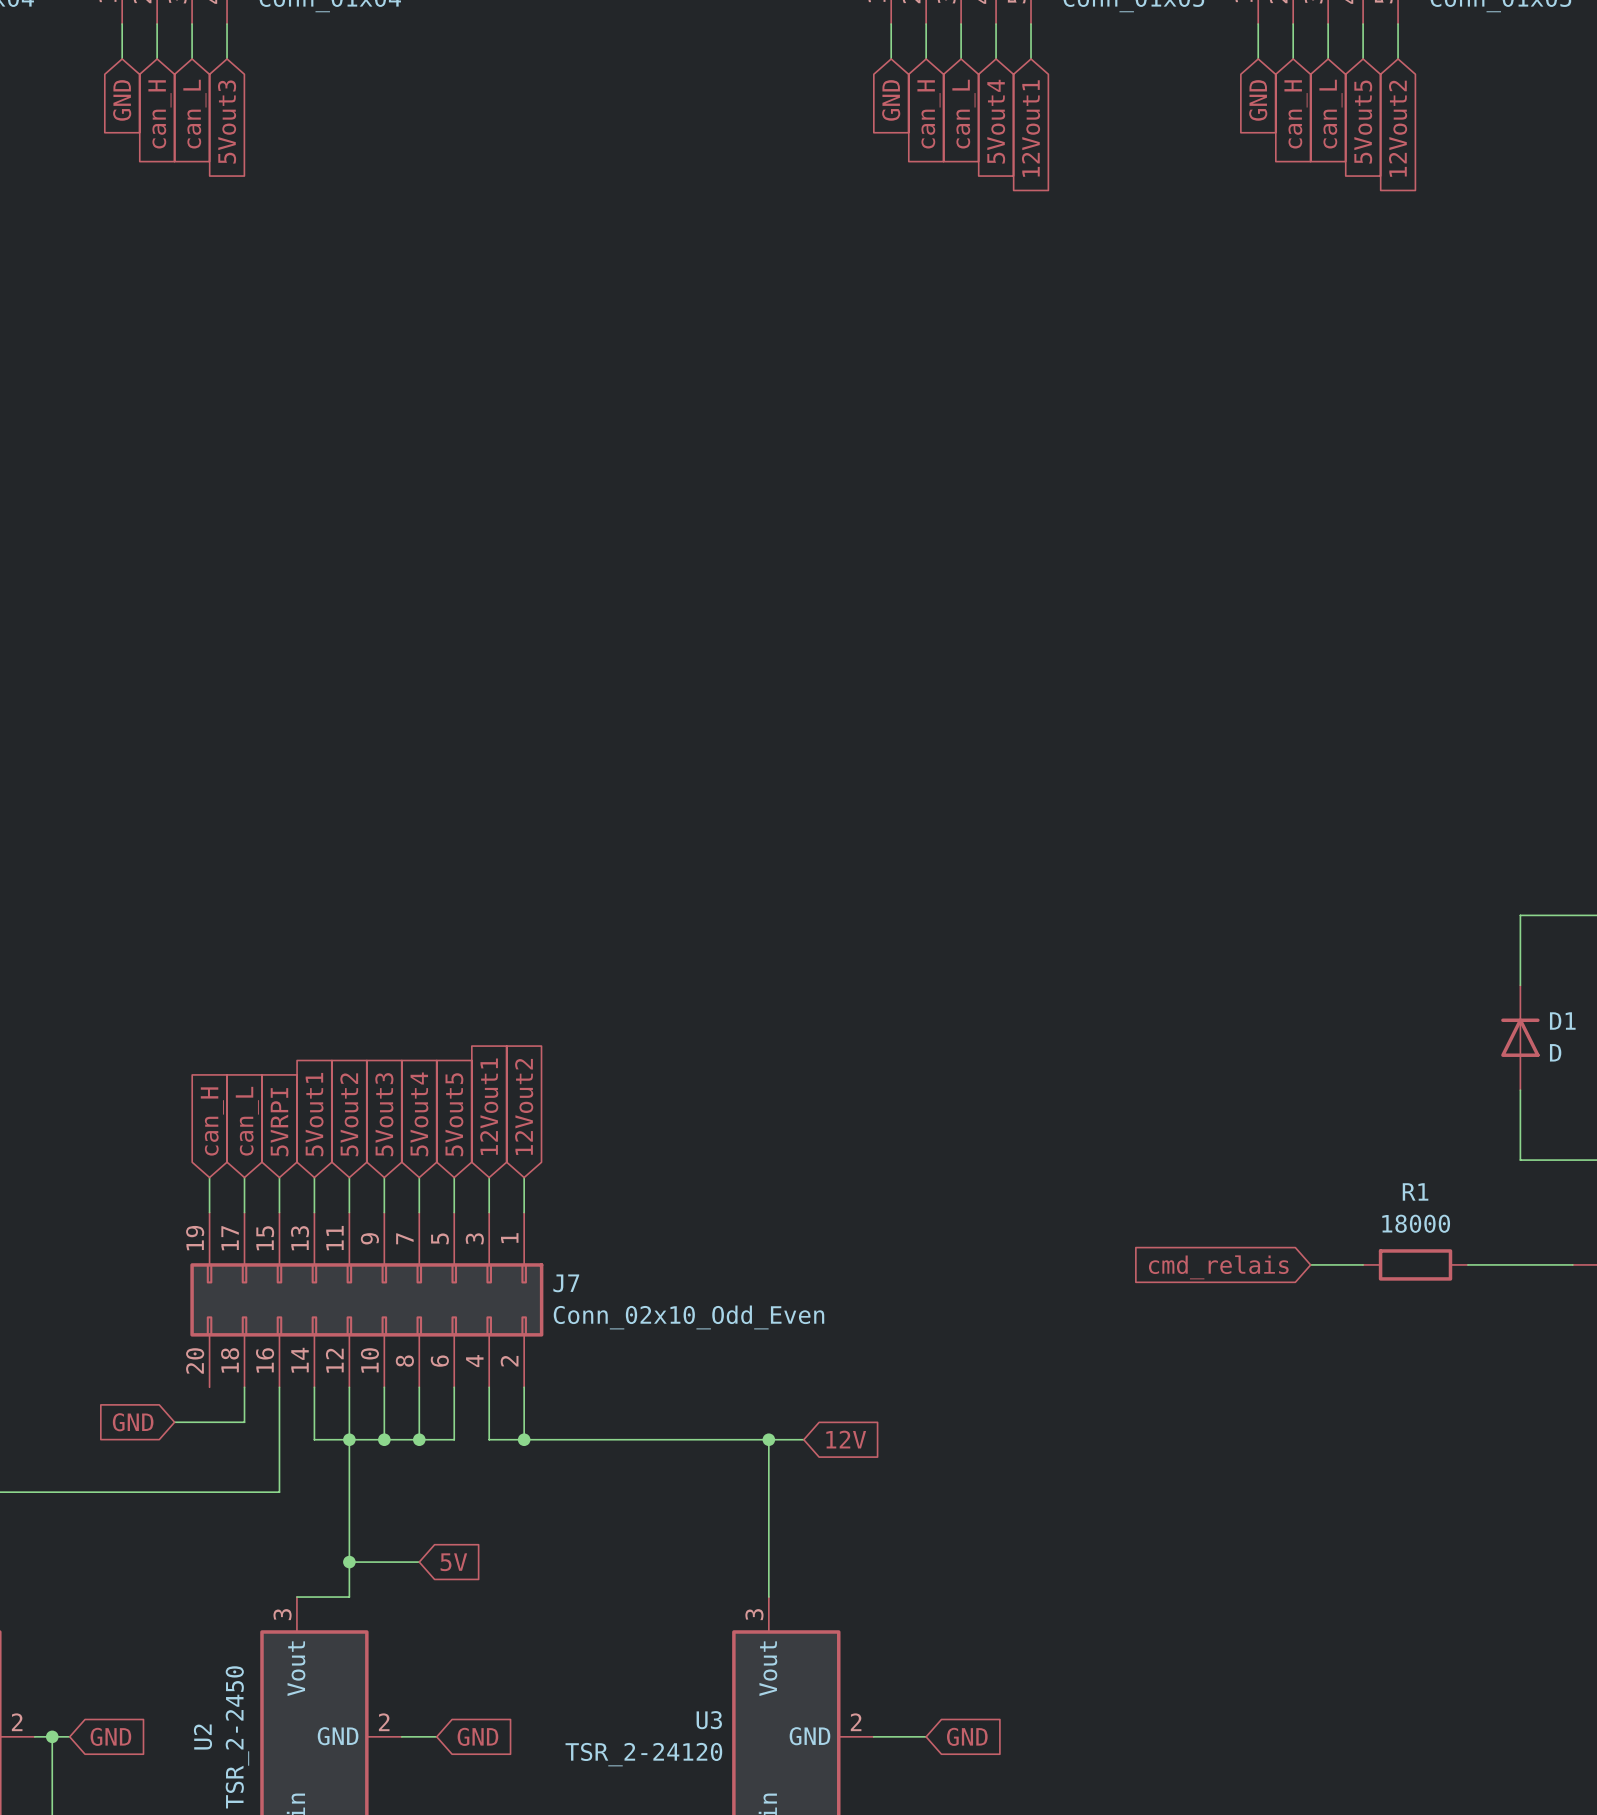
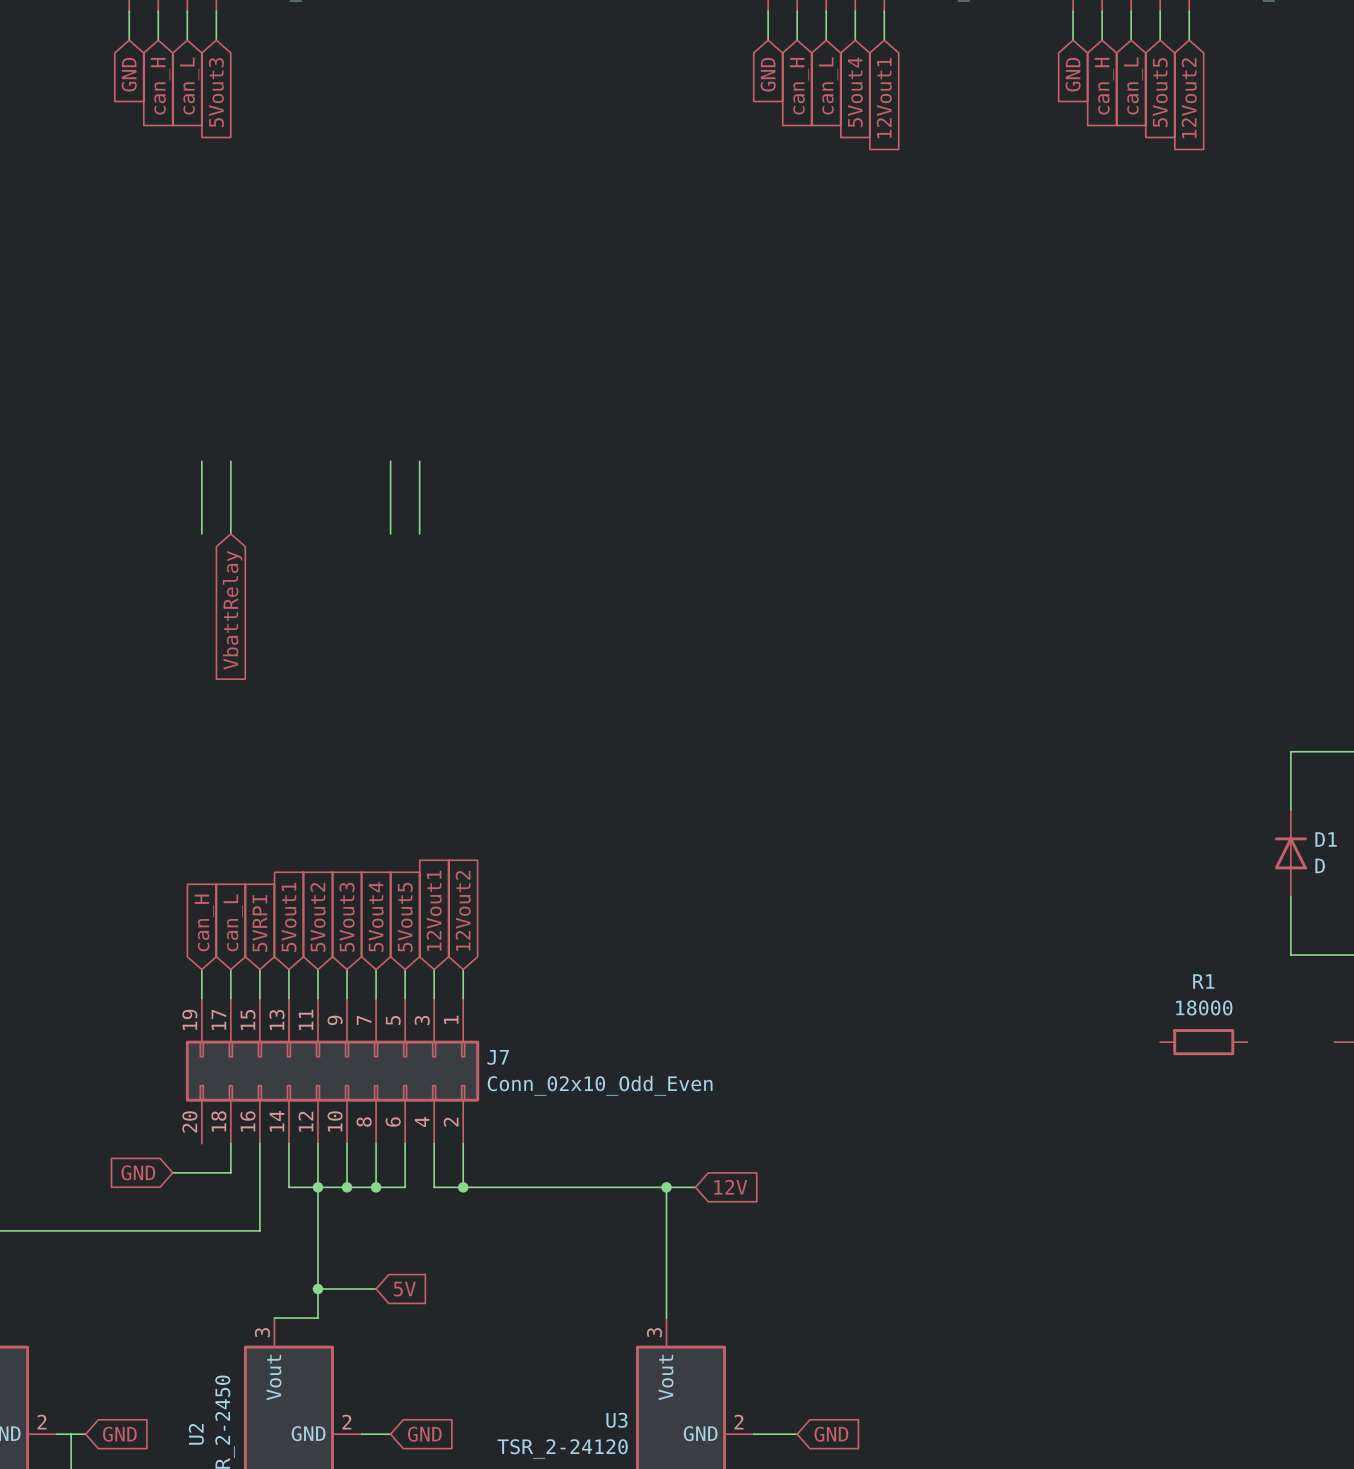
wire: none -> (201, 461) (201, 533)
wire: none -> (230, 461) (230, 533)
wire: none -> (390, 461) (390, 533)
wire: none -> (419, 461) (419, 533)
global label: none -> VbattRelay (232, 610)
wire: (1310, 1264) (1363, 1264) -> none
wire: (1467, 1264) (1572, 1264) -> none
global label: cmd_relais (1218, 1267) -> none
junction: (52, 1736) -> none

